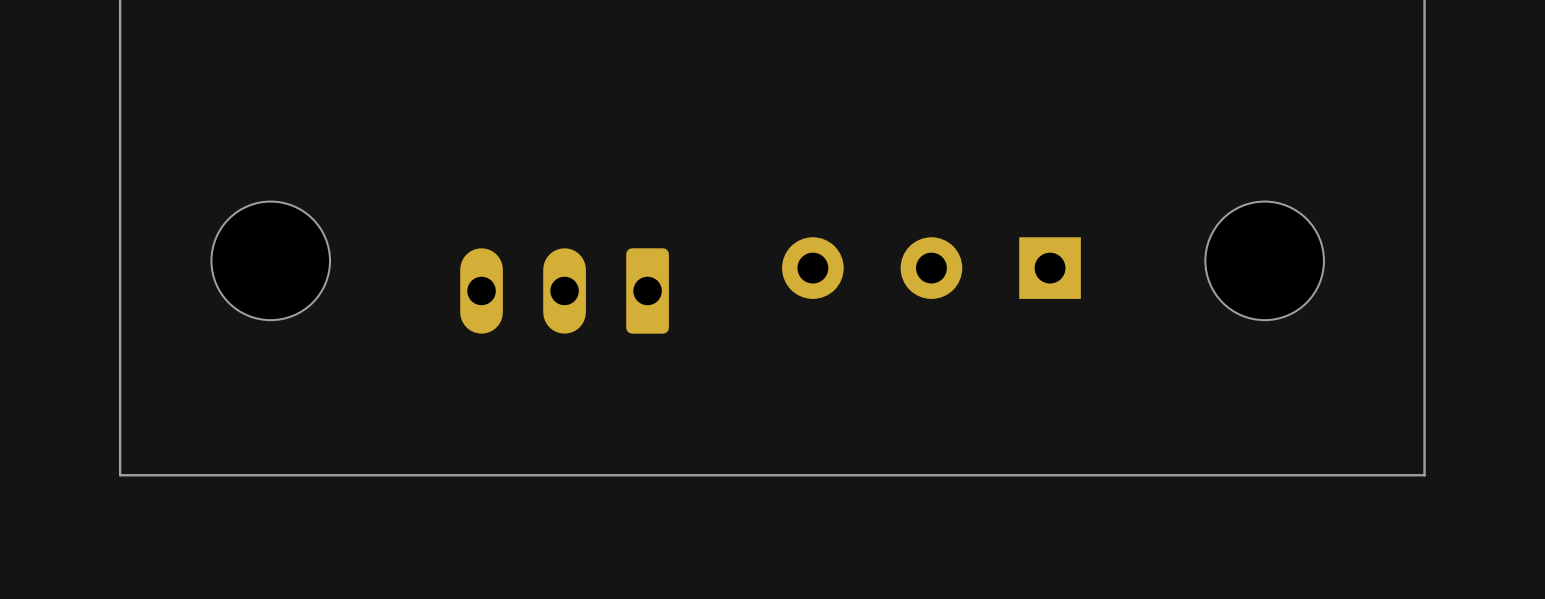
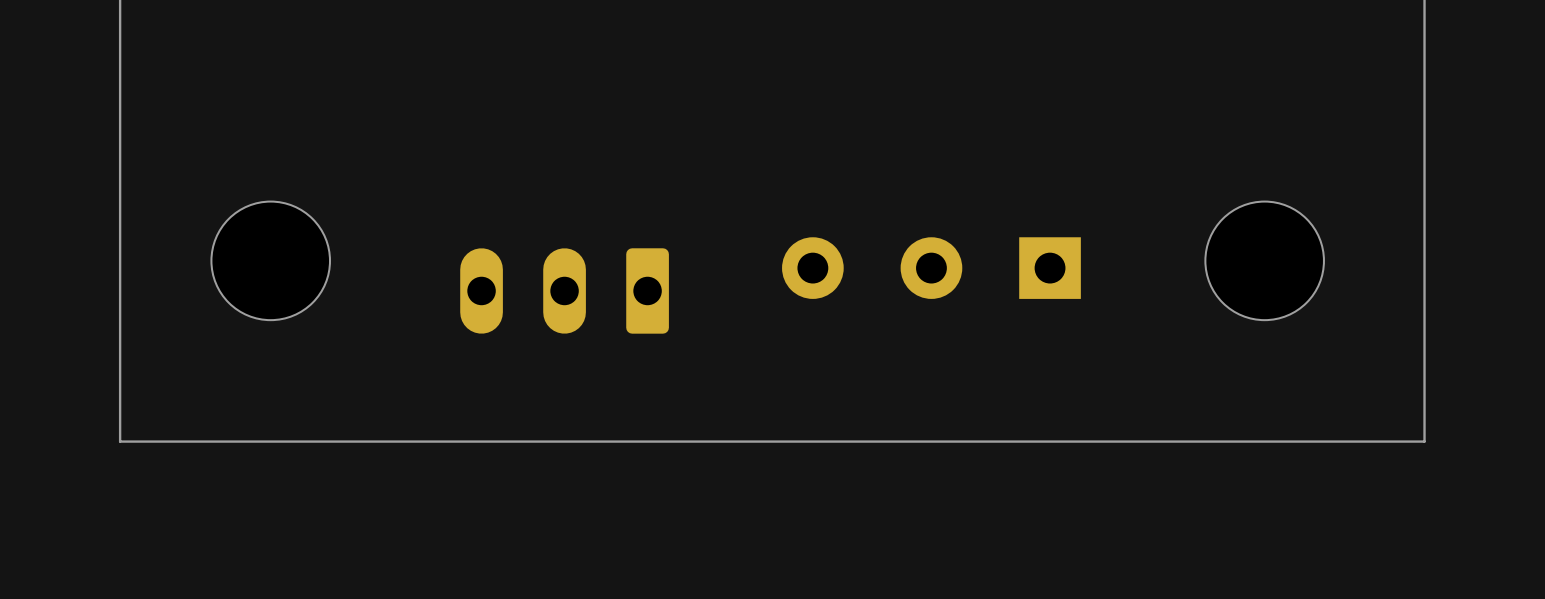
board edge: (1424, 441) (1424, 475) (120, 475) (120, 441) -> (1424, 441) (120, 441)

